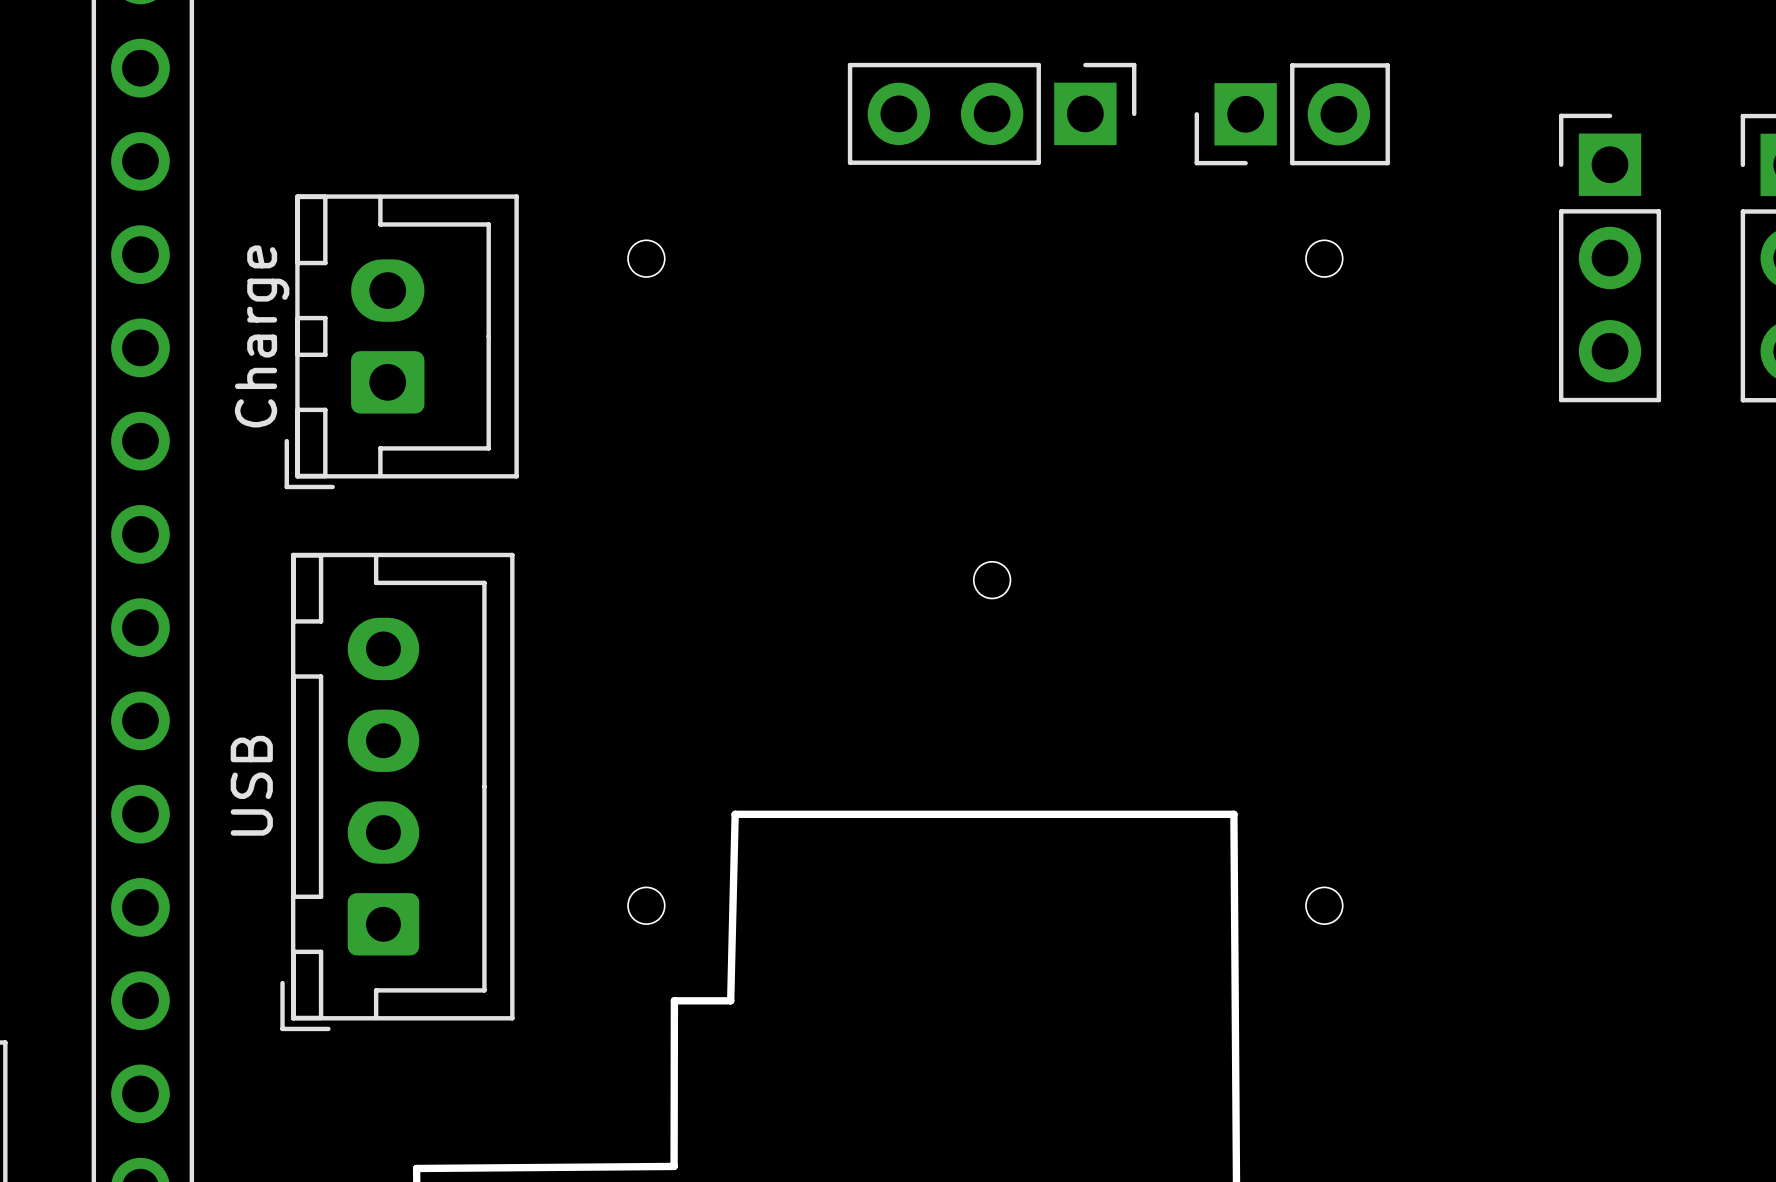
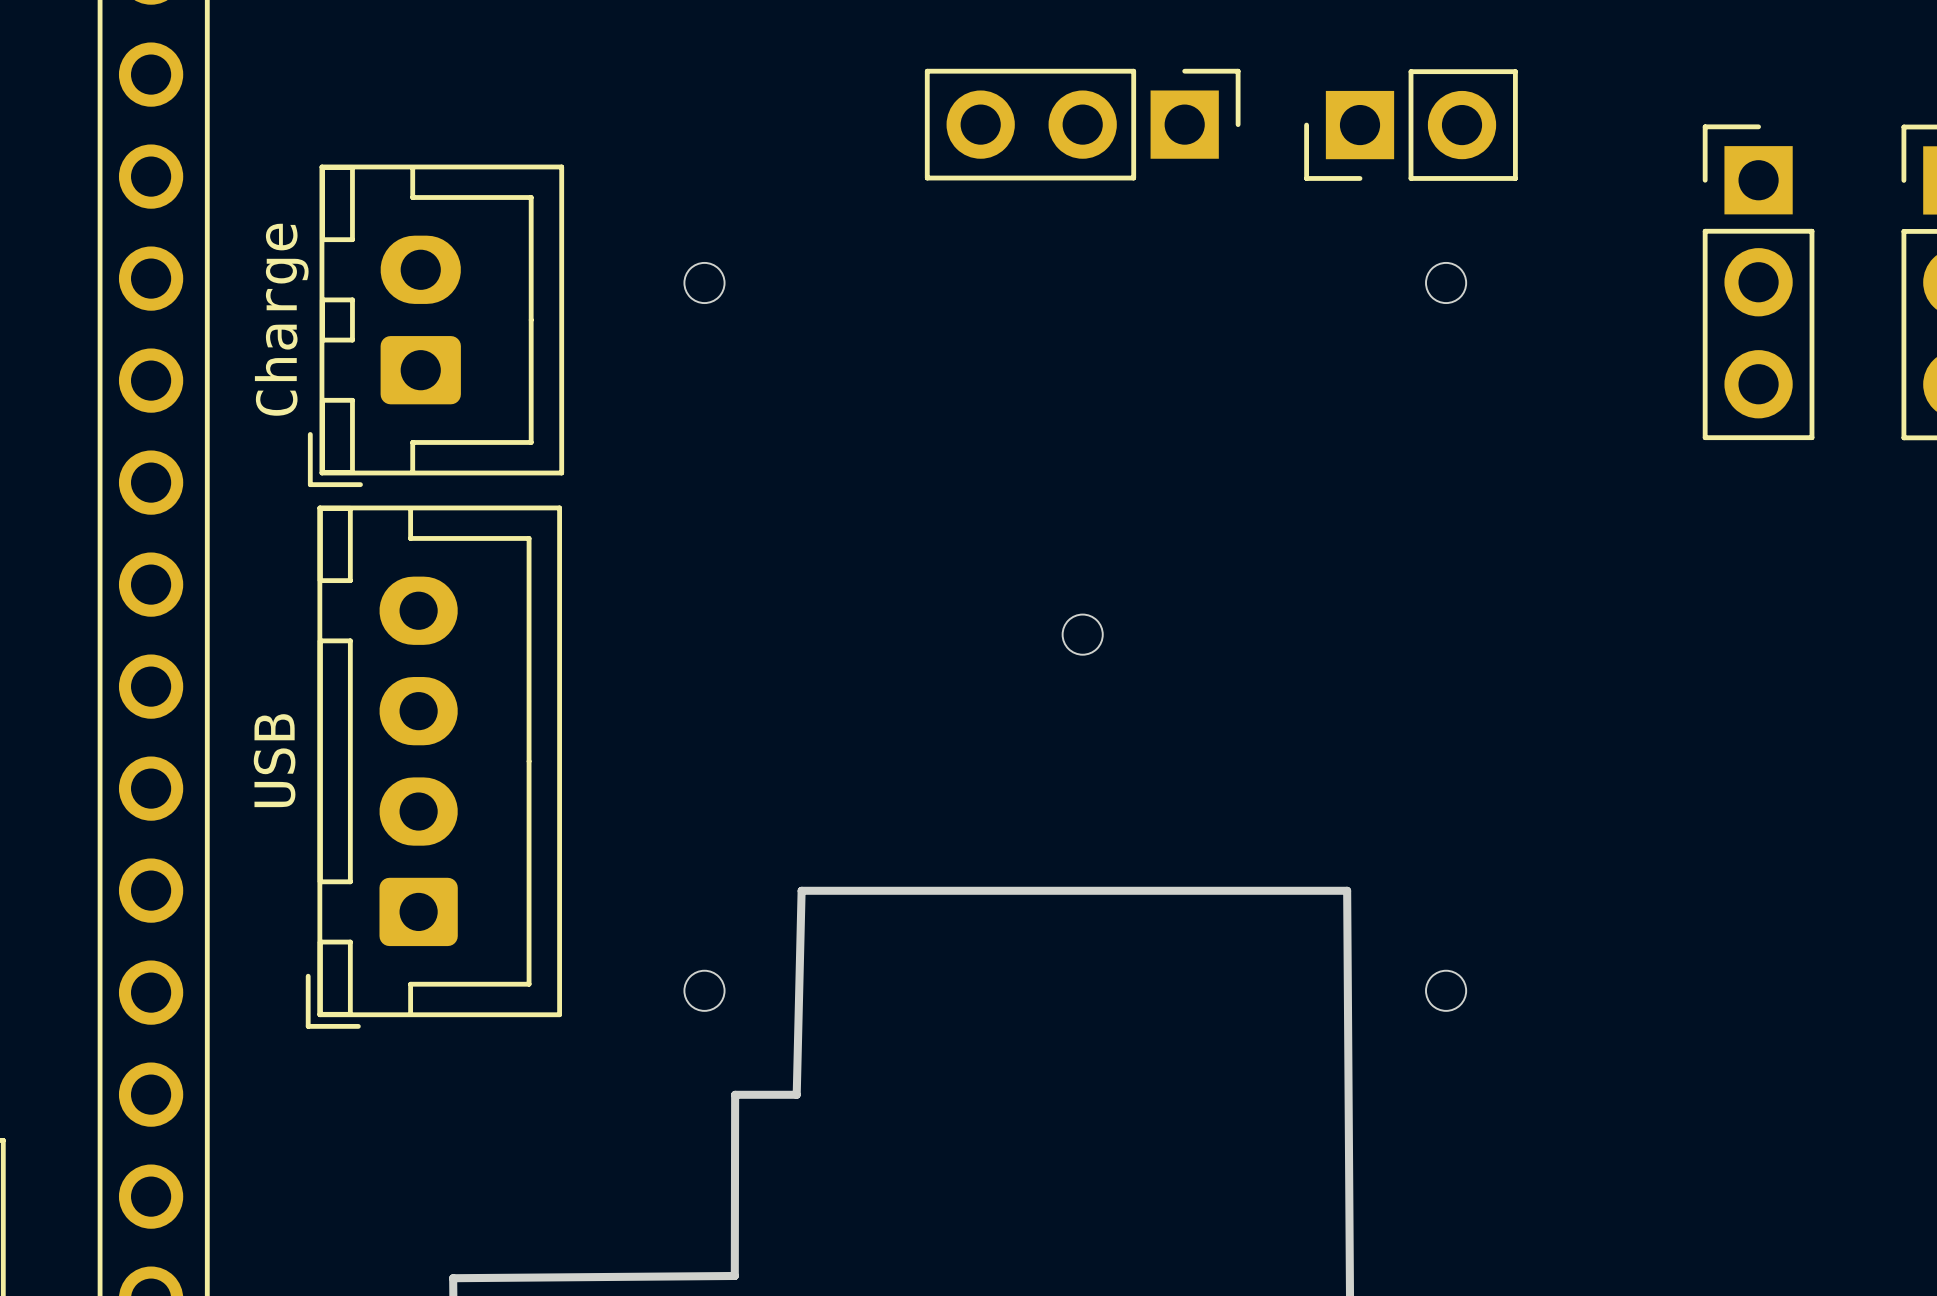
Charge position: (401, 341) -> (436, 325)
USB position: (397, 791) -> (433, 767)

